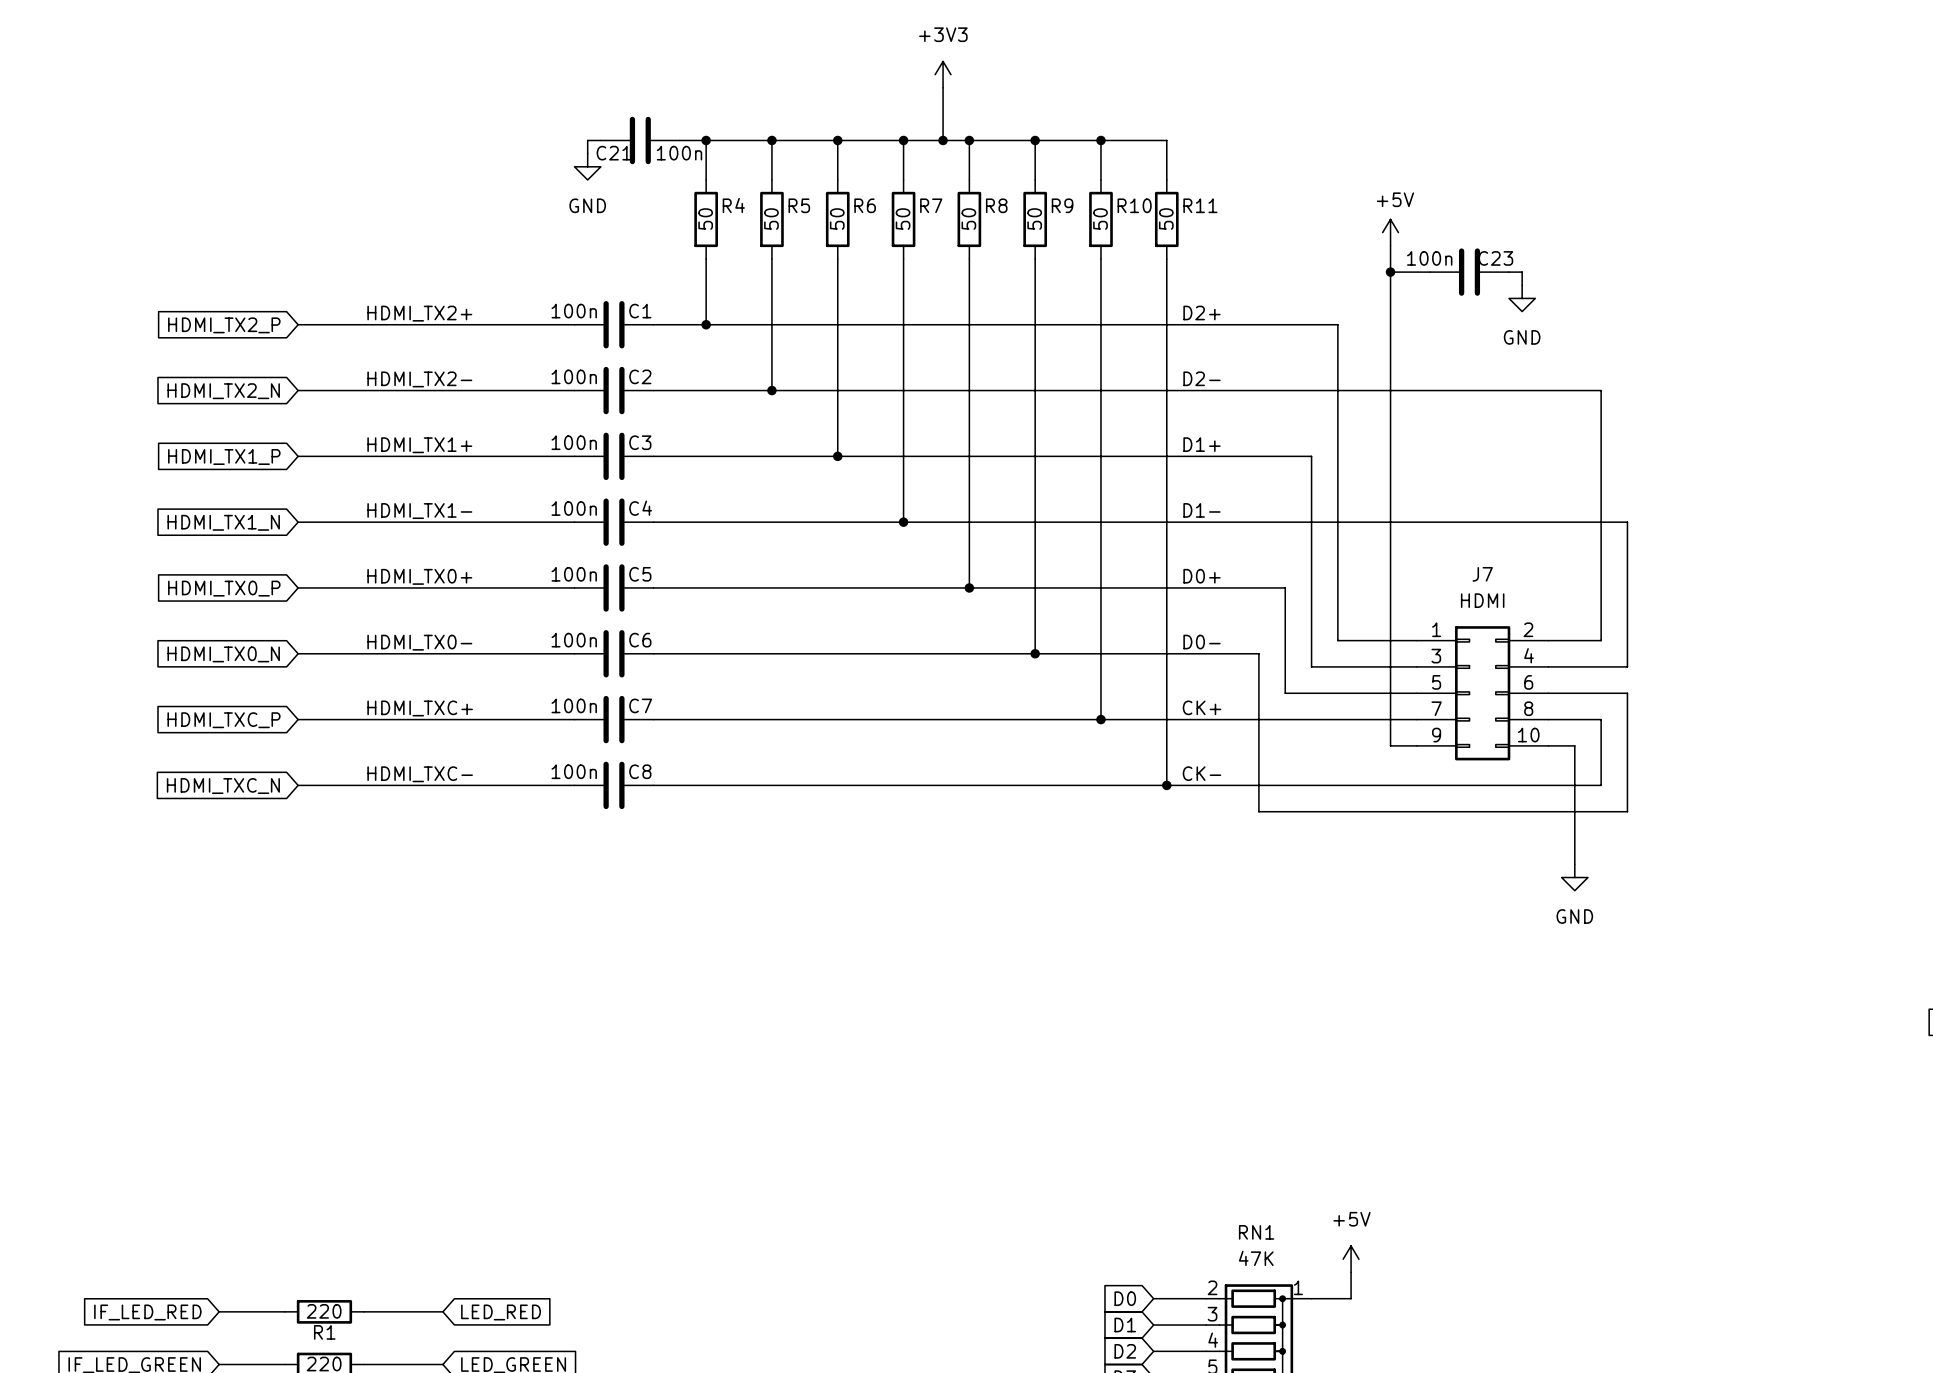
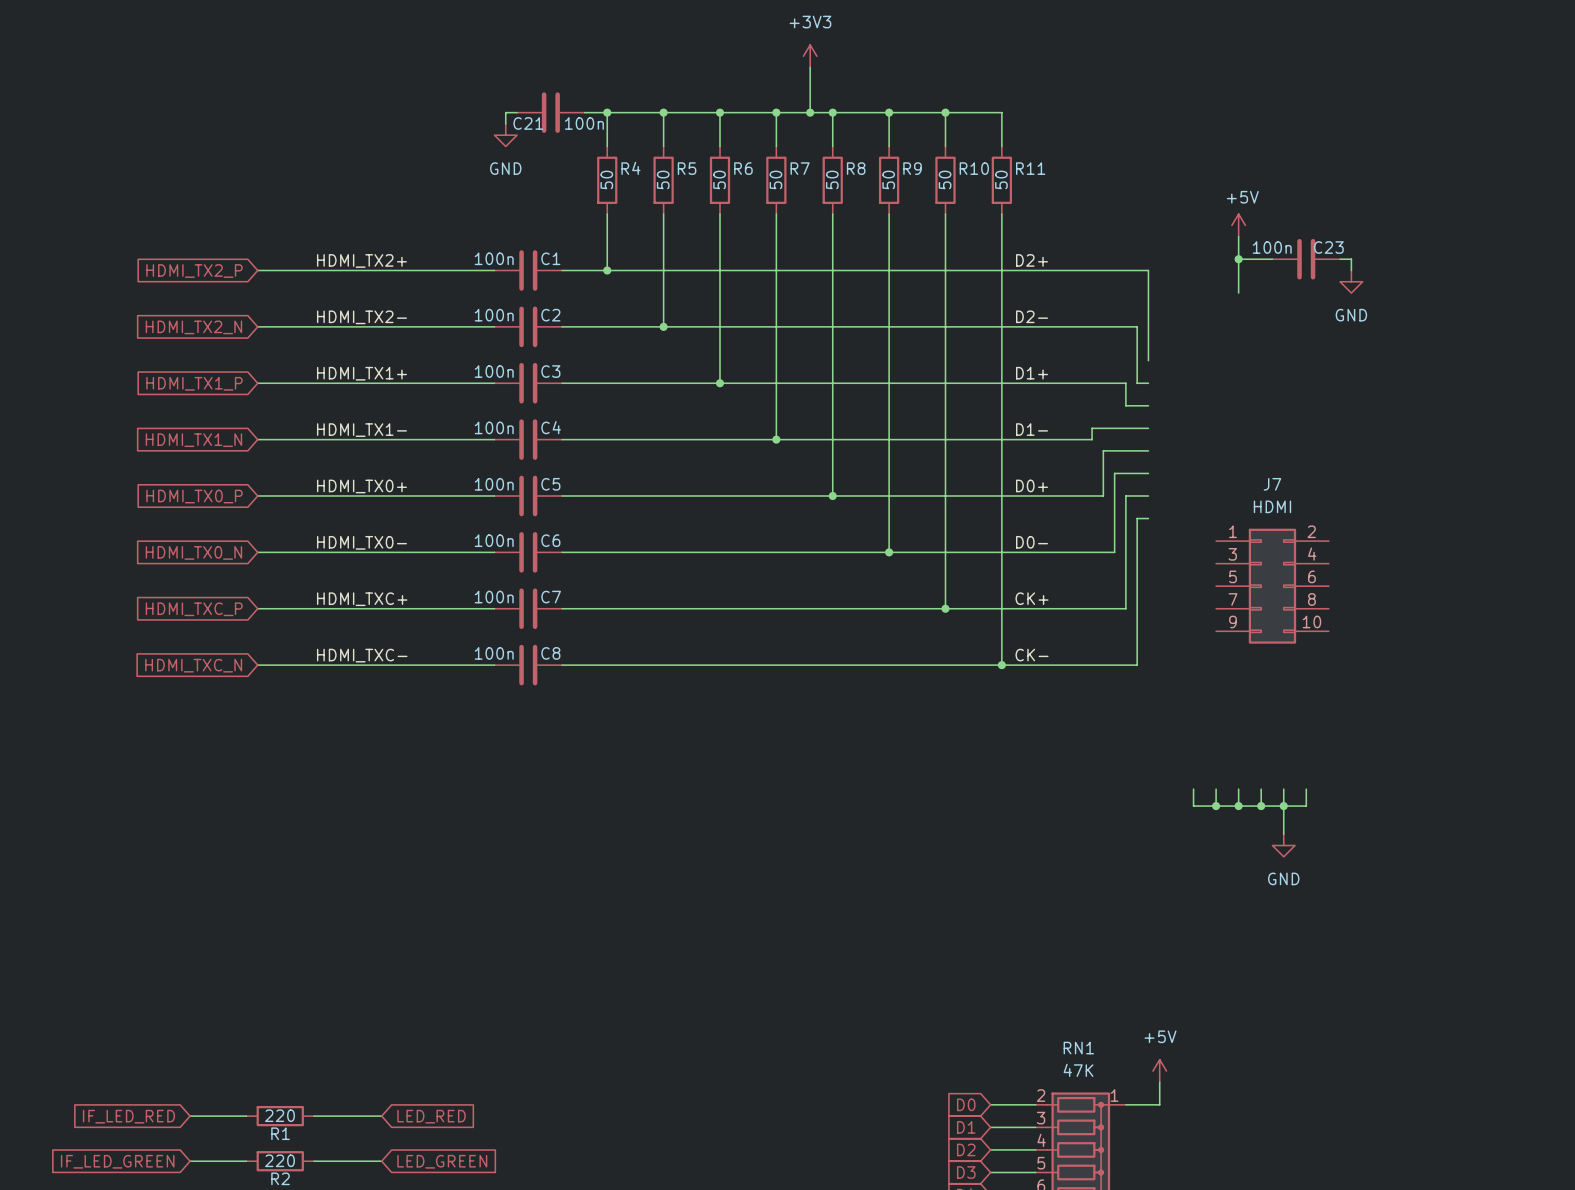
power symbol position: +5V (1390, 232) -> +5V (1238, 225)
wire: (1390, 245) (1390, 745) (1416, 745) -> none
wire: (1390, 272) (1430, 272) -> (1238, 259) (1272, 259)
junction: (1390, 272) -> none
C23 position: (1469, 272) -> (1306, 259)
wire: (1508, 272) (1522, 272) (1522, 285) -> (1340, 259) (1351, 259) (1351, 270)
wire: none -> (1238, 236) (1238, 293)
power symbol position: GND (1522, 298) -> GND (1351, 281)
junction: none -> (1238, 259)
wire: (1324, 390) (1601, 390) (1601, 640) (1548, 640) -> (1137, 326) (1137, 383) (1148, 383)
wire: (1337, 430) (1337, 640) (1416, 640) -> none
wire: (1311, 482) (1311, 587) -> (1125, 405) (1148, 405)
wire: (1272, 522) (1627, 522) (1627, 666) (1548, 666) -> (1092, 439) (1092, 428) (1148, 428)
wire: (1285, 587) (1285, 693) (1416, 693) -> (1103, 495) (1103, 450) (1148, 450)
wire: none -> (1125, 495) (1148, 495)
wire: (1258, 653) (1258, 811) (1627, 811) (1627, 693) (1548, 693) -> (1080, 552) (1114, 552) (1114, 473) (1148, 473)
wire: (1311, 666) (1416, 666) -> (1125, 563) (1125, 608)
wire: (1311, 719) (1416, 719) -> none
wire: (1548, 719) (1601, 719) (1601, 785) (1324, 785) -> (1148, 518) (1137, 518) (1137, 665)
wire: (1548, 745) (1574, 745) (1574, 864) -> none
power symbol position: GND (1574, 877) -> GND (1283, 845)
wire: none -> (1193, 789) (1193, 806) (1306, 806) (1306, 789)
wire: none -> (1216, 789) (1216, 806)
wire: none -> (1238, 789) (1238, 806)
wire: none -> (1261, 789) (1261, 806)
wire: none -> (1283, 789) (1283, 834)
junction: none -> (1216, 806)
junction: none -> (1238, 806)
junction: none -> (1261, 806)
junction: none -> (1283, 806)

